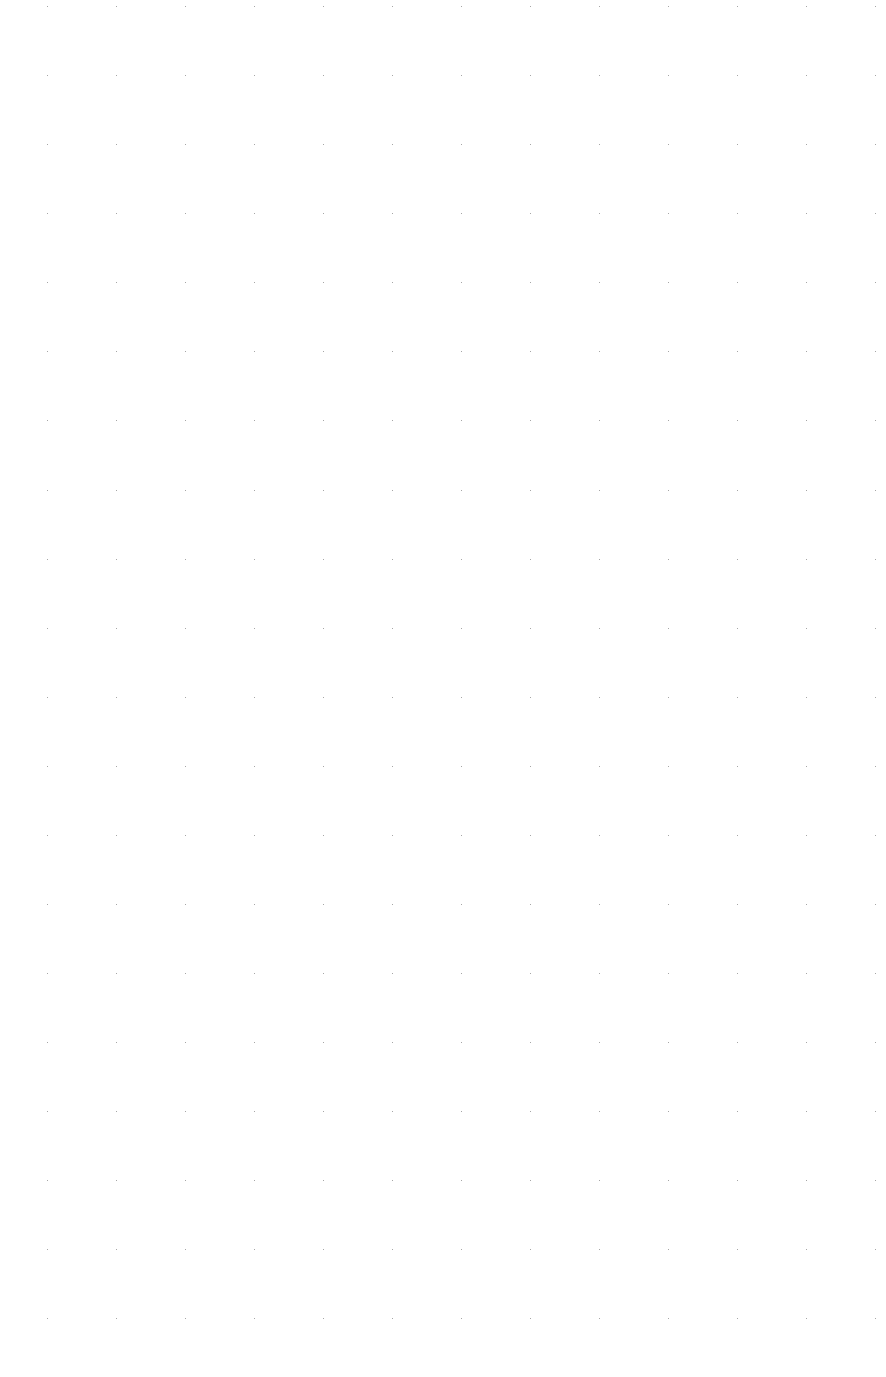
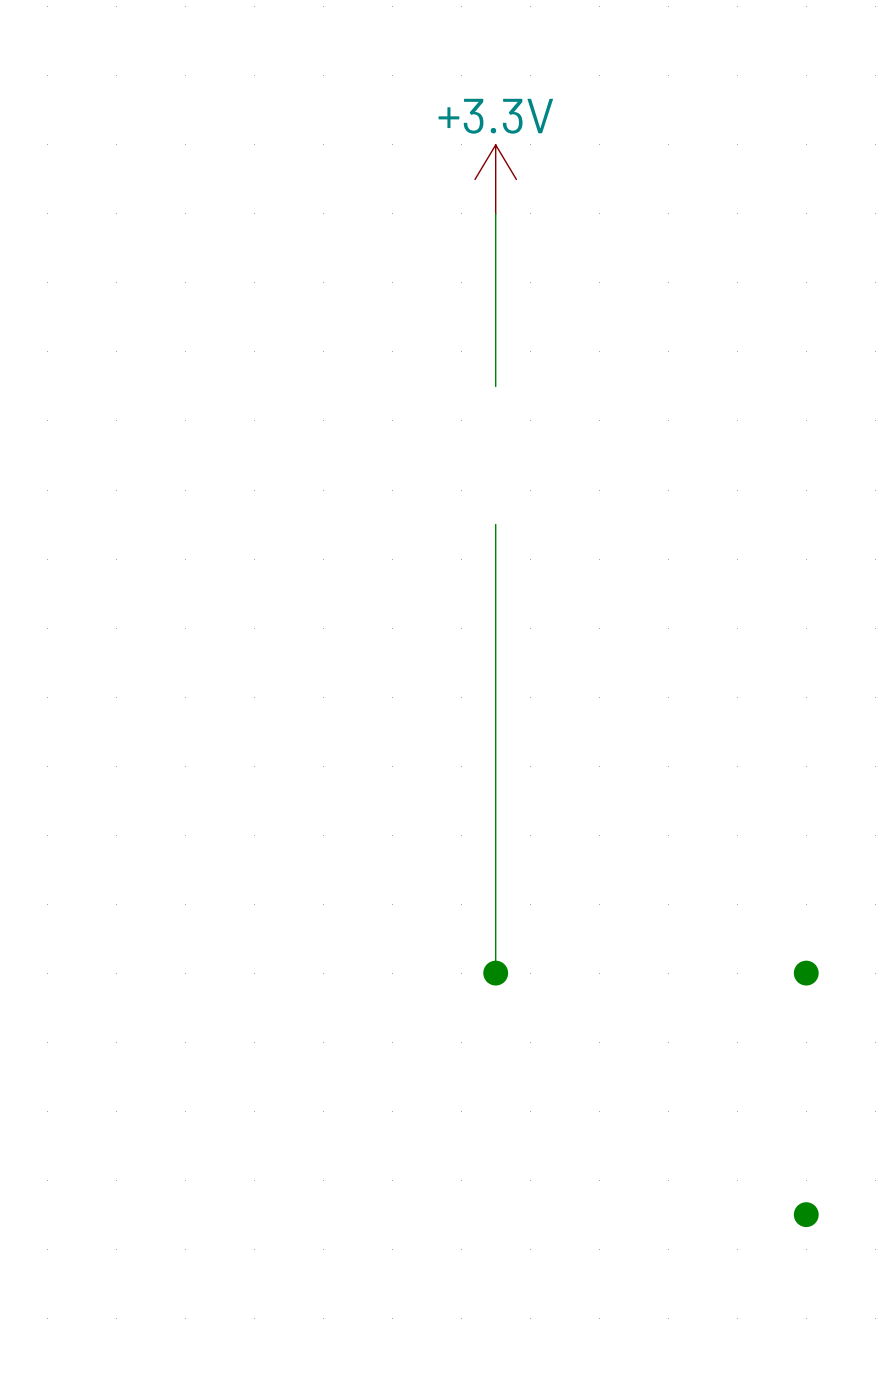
power symbol: none -> +3.3V (495, 179)
wire: none -> (495, 213) (495, 386)
wire: none -> (495, 524) (495, 973)
junction: none -> (495, 973)
junction: none -> (806, 973)
junction: none -> (806, 1214)

